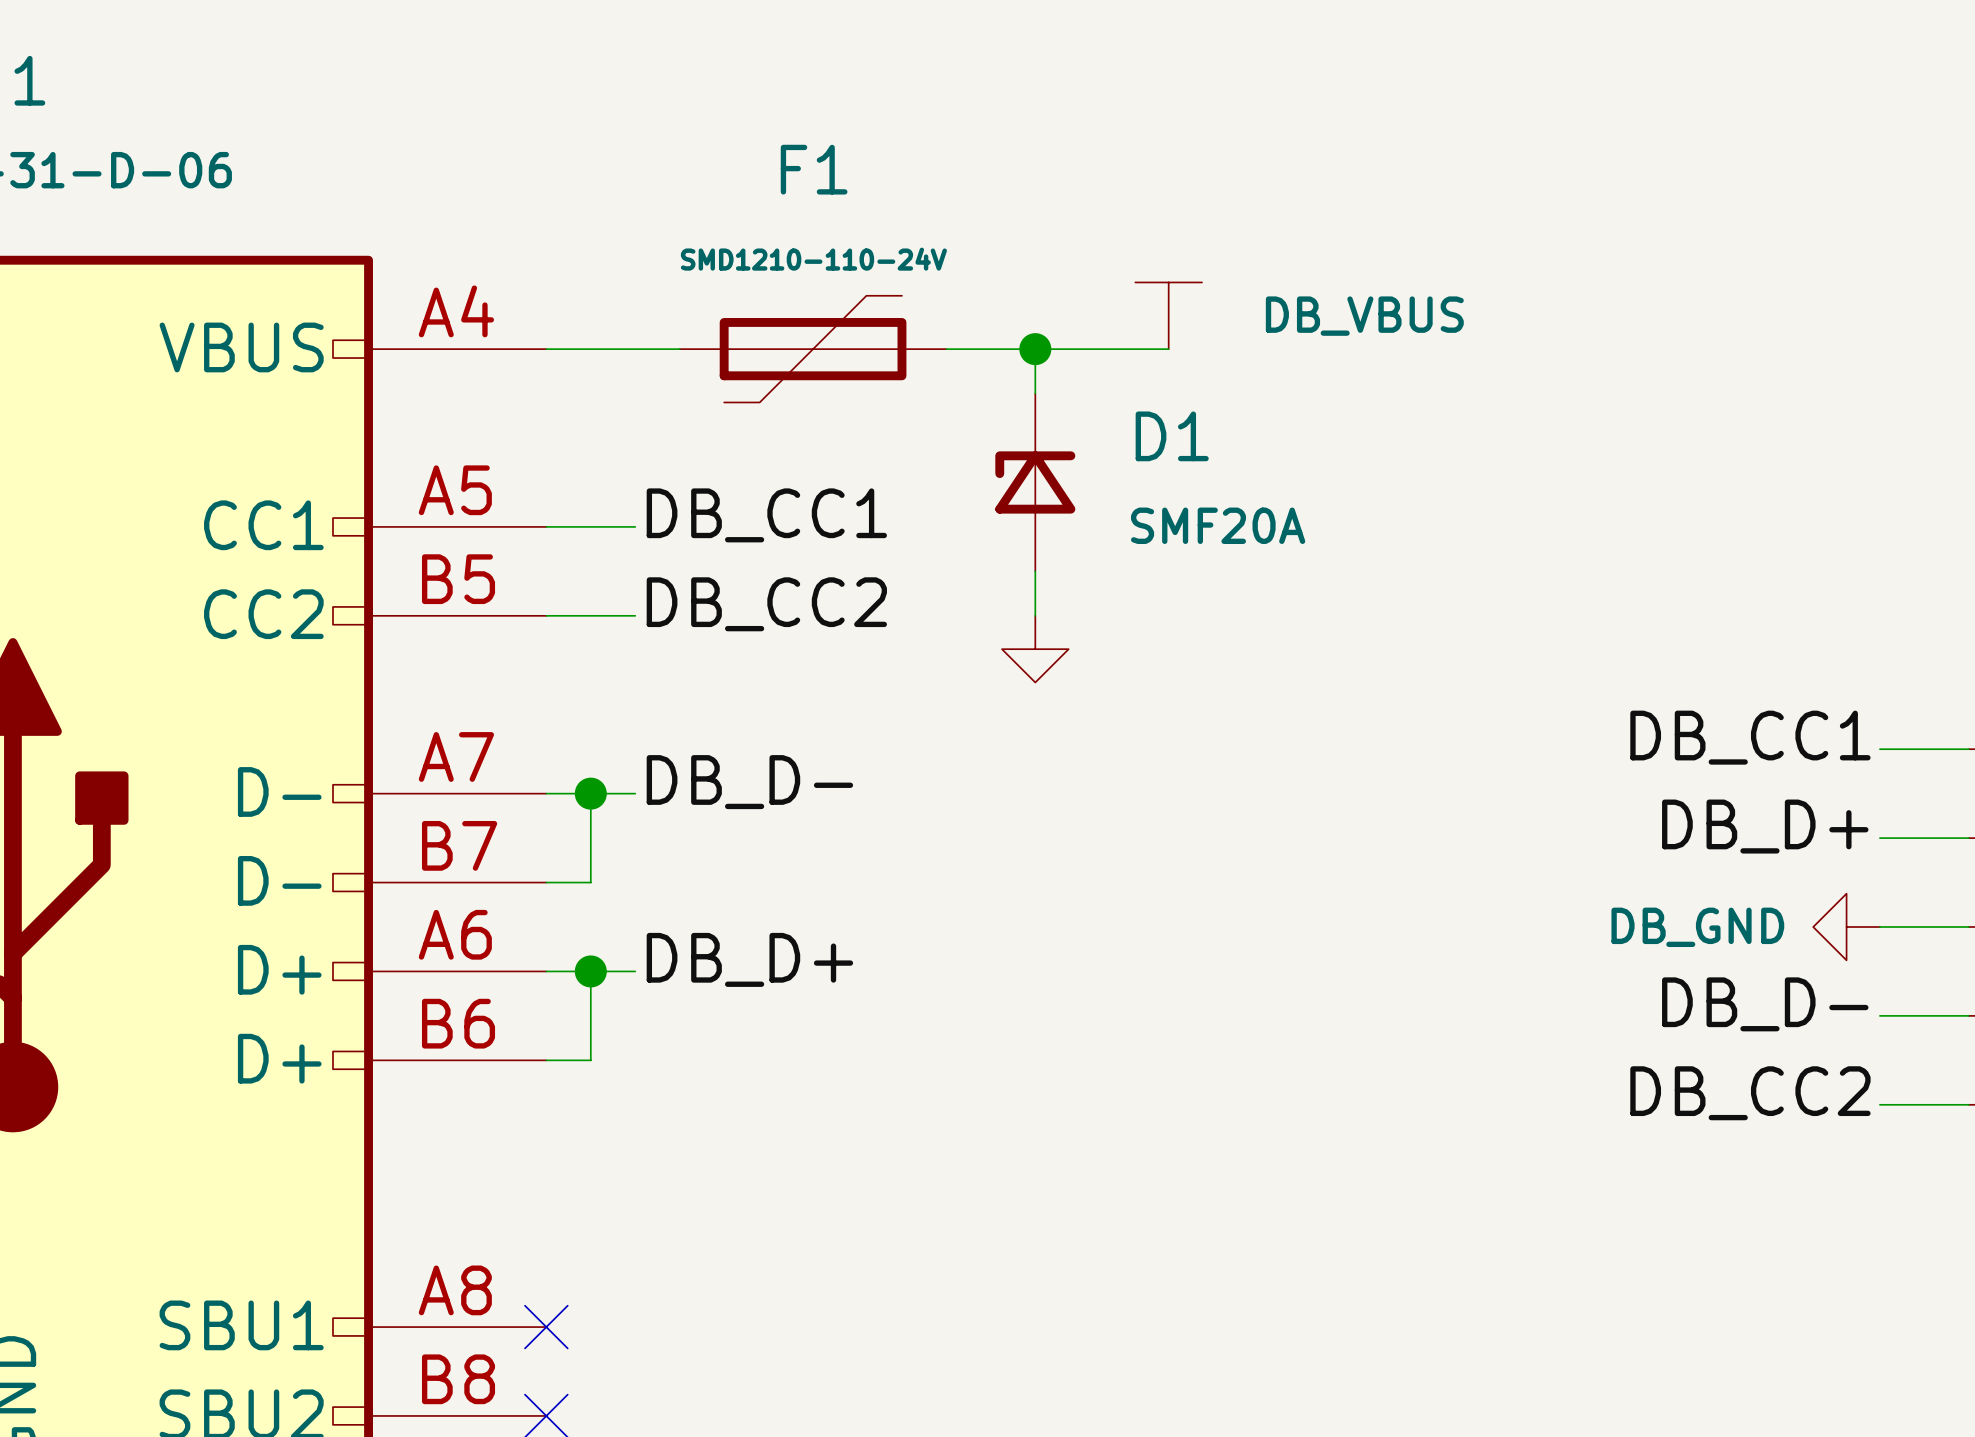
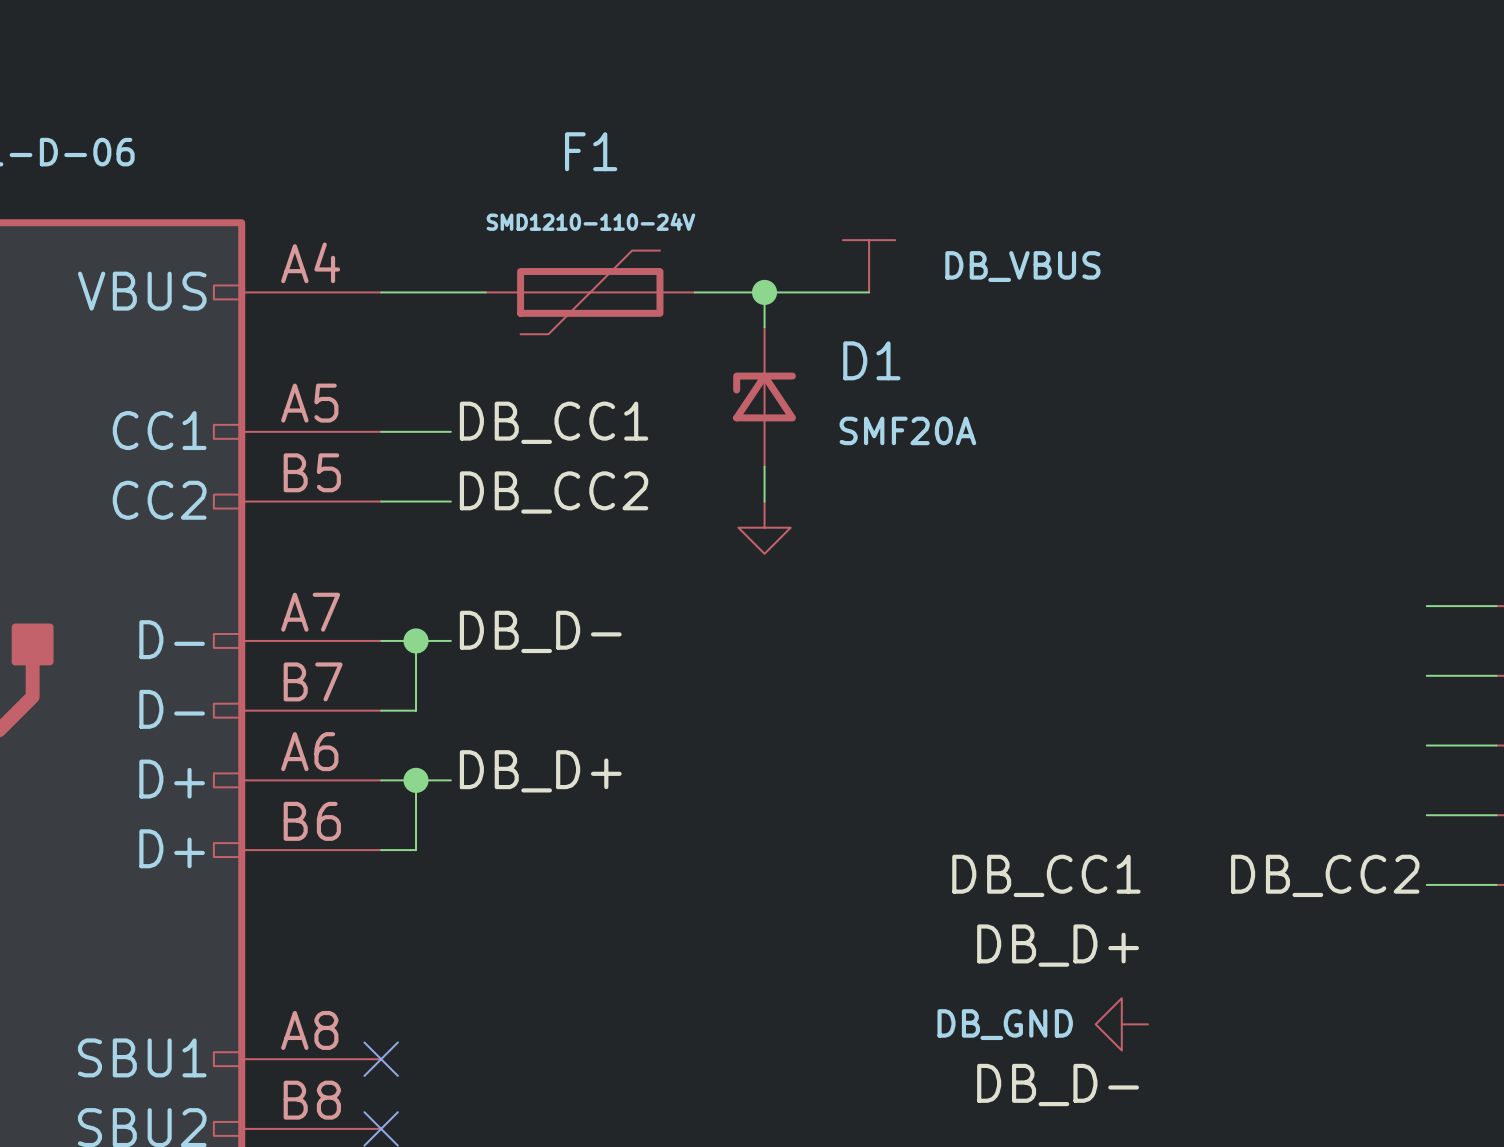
label: DB_CC1 (1750, 737) -> none
label: DB_D+ (1765, 826) -> none
power symbol: DB_GND (1846, 926) -> none
label: DB_D- (1765, 1004) -> none
label: none -> DB_CC1 (1046, 875)
label: none -> DB_D+ (1058, 945)
power symbol: none -> DB_GND (1121, 1024)
label: none -> DB_D- (1058, 1085)

